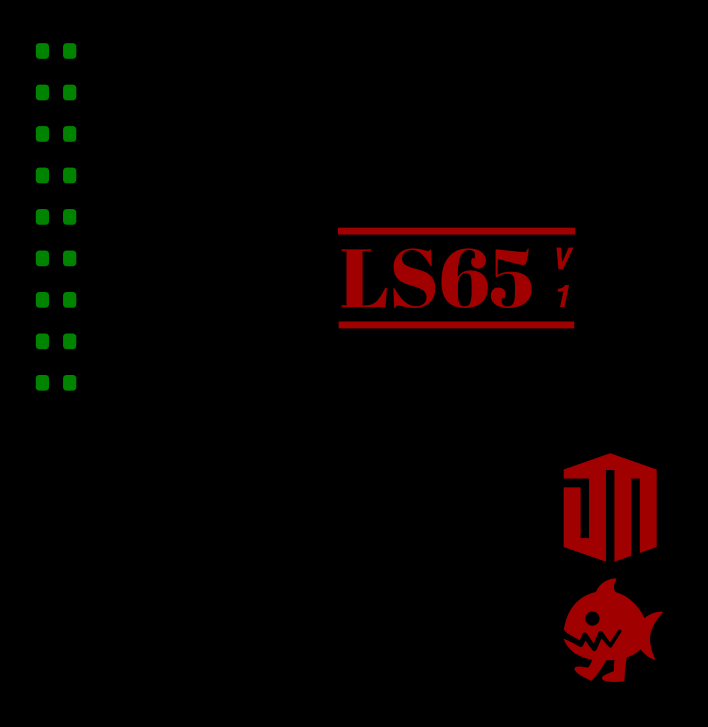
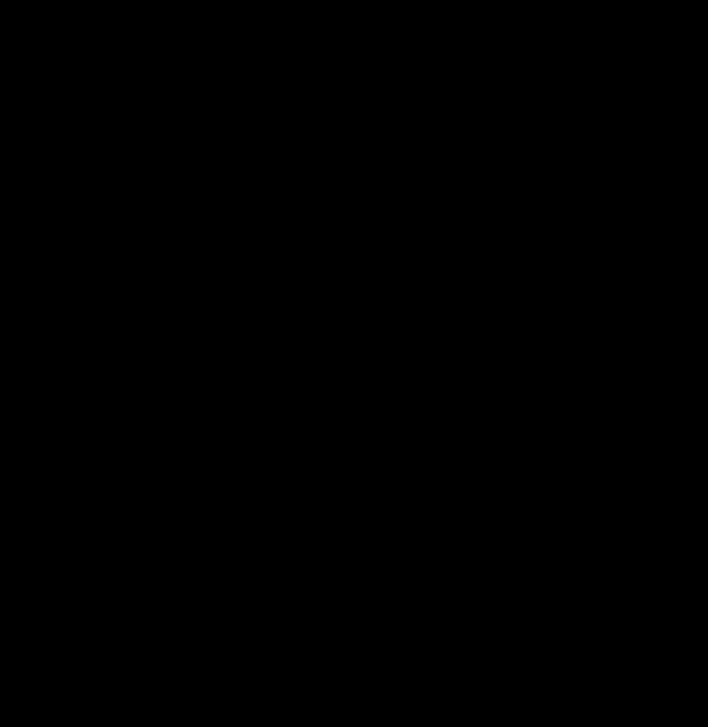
part: (56, 51) -> none
part: (56, 92) -> none
part: (56, 133) -> none
part: (56, 175) -> none
part: (56, 216) -> none
drawing: [337, 227, 576, 329] -> none
part: (56, 258) -> none
part: (56, 299) -> none
part: (56, 341) -> none
part: (56, 382) -> none
drawing: [563, 453, 663, 682] -> none

